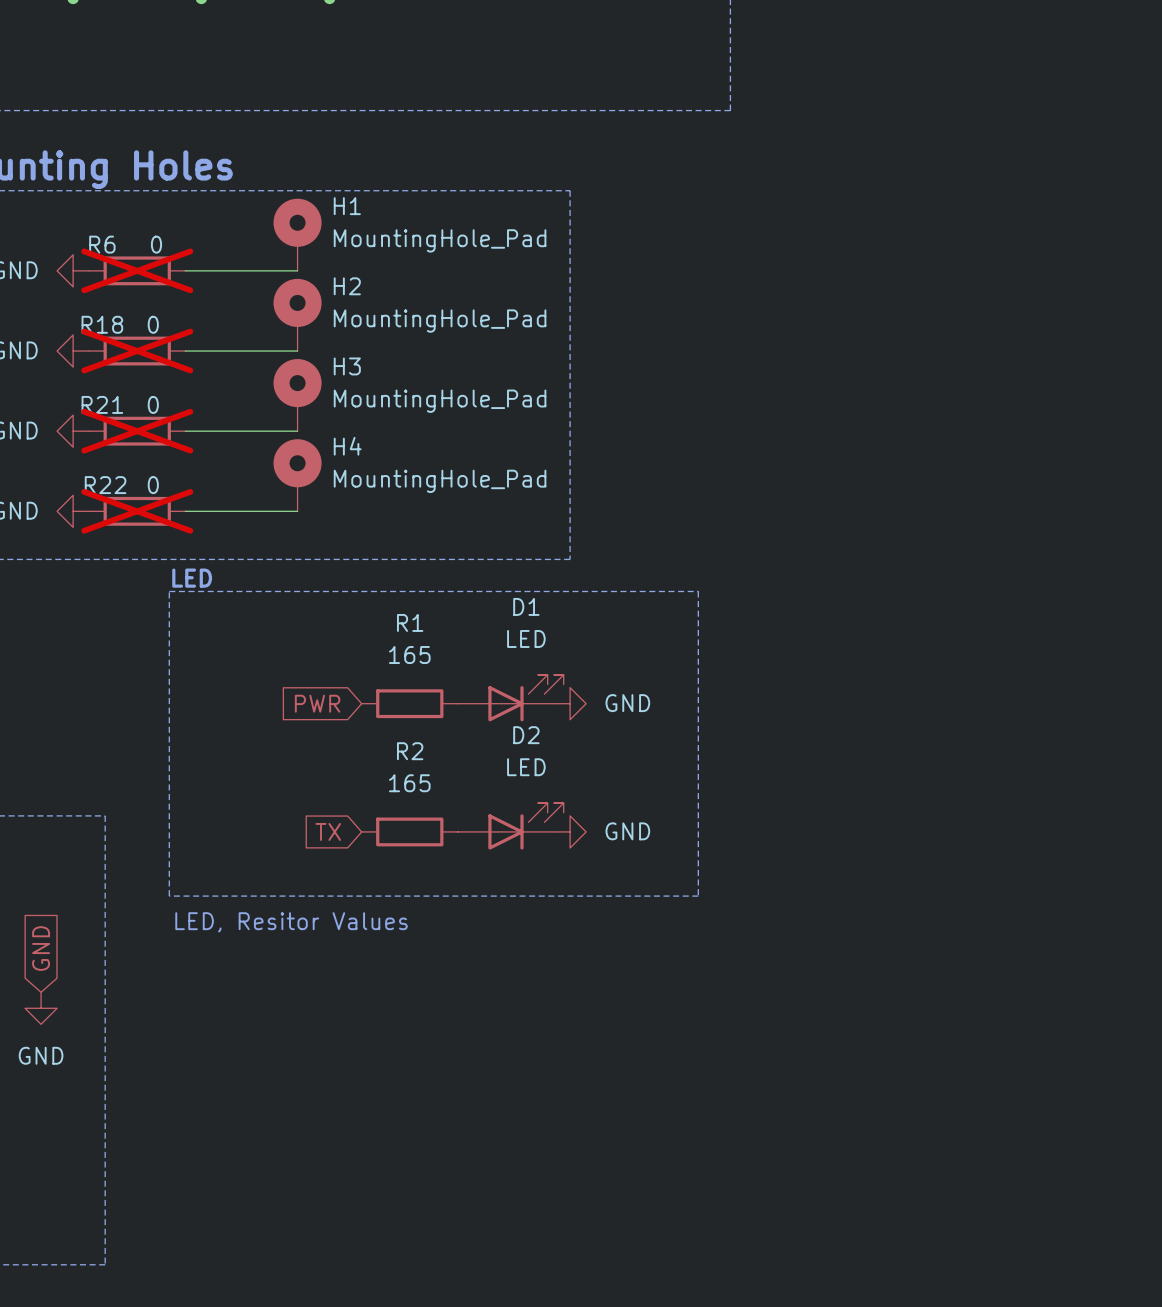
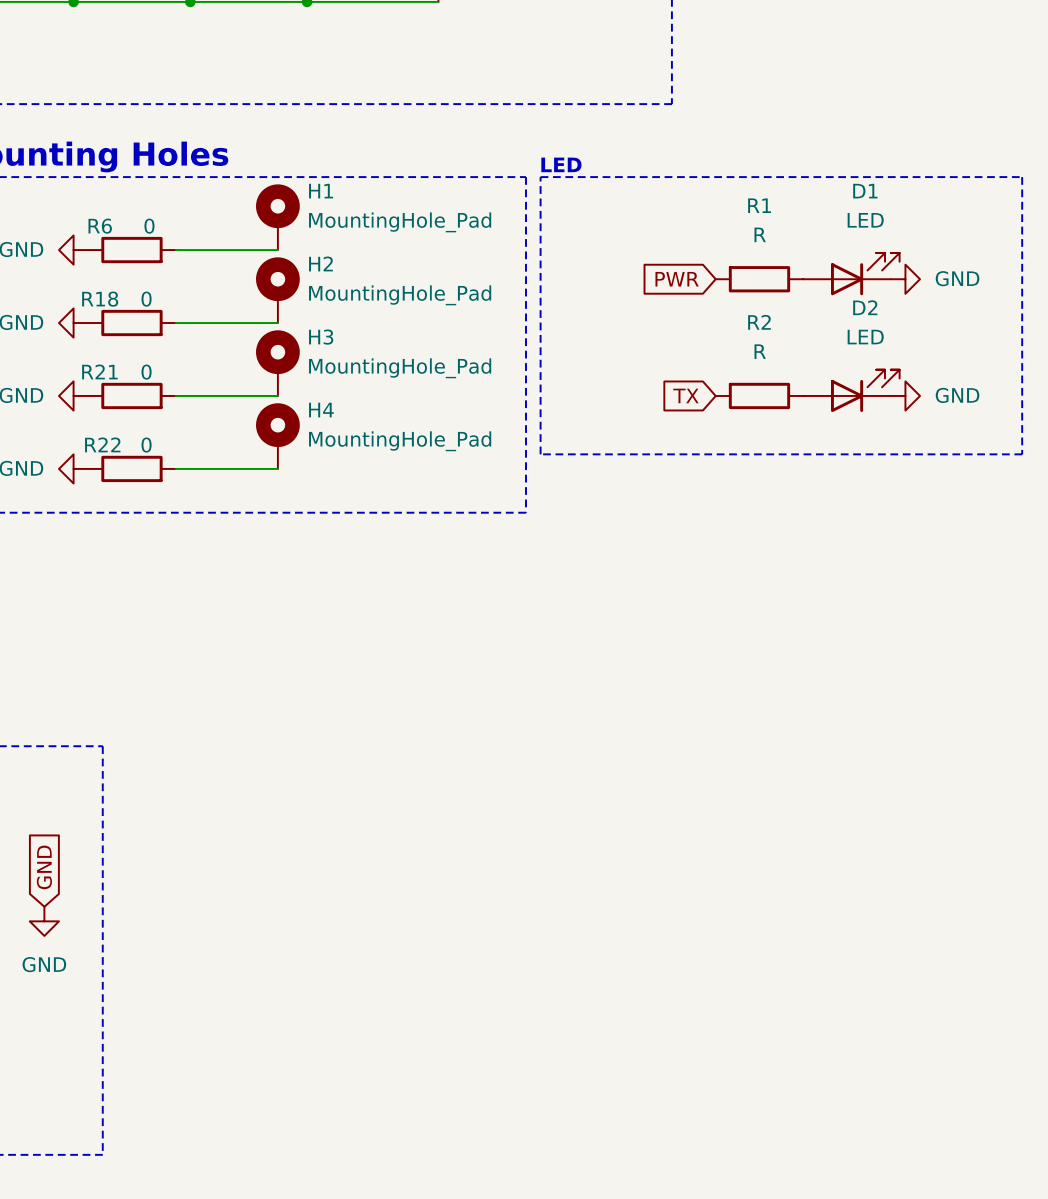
text: none -> LED (561, 164)
line: none -> (540, 177) (1022, 177) (1022, 454) (540, 454) (540, 177)
R6 do-not-place cross: (137, 270) -> none
global label: none -> PWR (677, 279)
power symbol: none -> GND (905, 279)
R18 do-not-place cross: (137, 351) -> none
R21 do-not-place cross: (137, 431) -> none
global label: none -> TX (685, 395)
power symbol: none -> GND (905, 395)
R22 do-not-place cross: (137, 511) -> none
text: LED (192, 578) -> none
line: (169, 591) (698, 591) (698, 896) (169, 896) (169, 591) -> none
R1 value: 165 (409, 655) -> R (760, 234)
D1 position: (510, 698) -> (851, 274)
global label: PWR (317, 703) -> none
R1 position: (409, 703) -> (759, 279)
power symbol: GND (570, 703) -> none
R2 value: 165 (409, 783) -> R (760, 351)
D2 position: (510, 826) -> (851, 390)
global label: TX (328, 831) -> none
R2 position: (409, 831) -> (759, 395)
power symbol: GND (570, 831) -> none
text: LED, Resitor Values (291, 922) -> none

